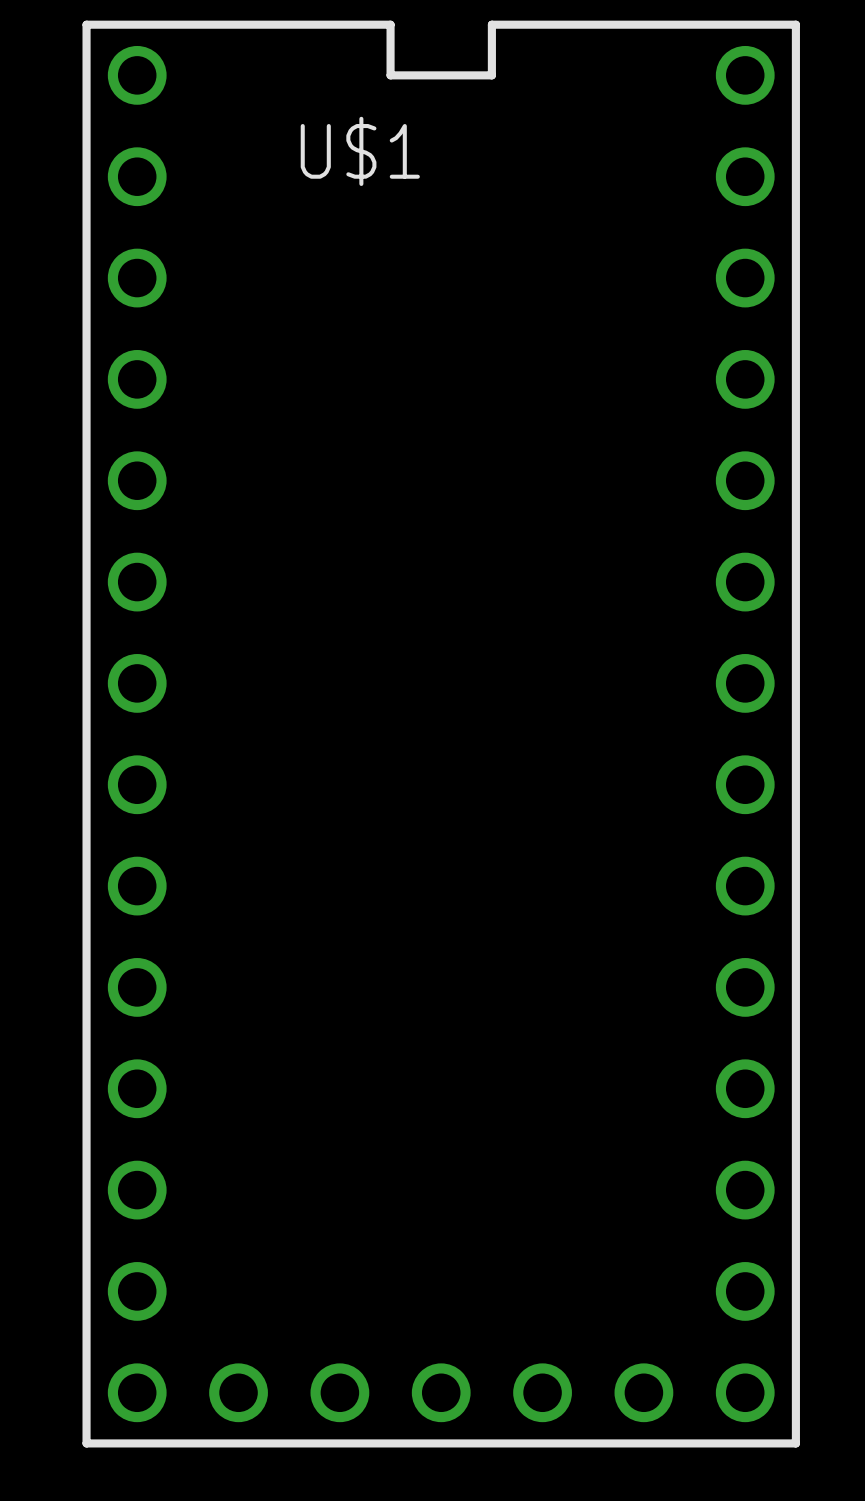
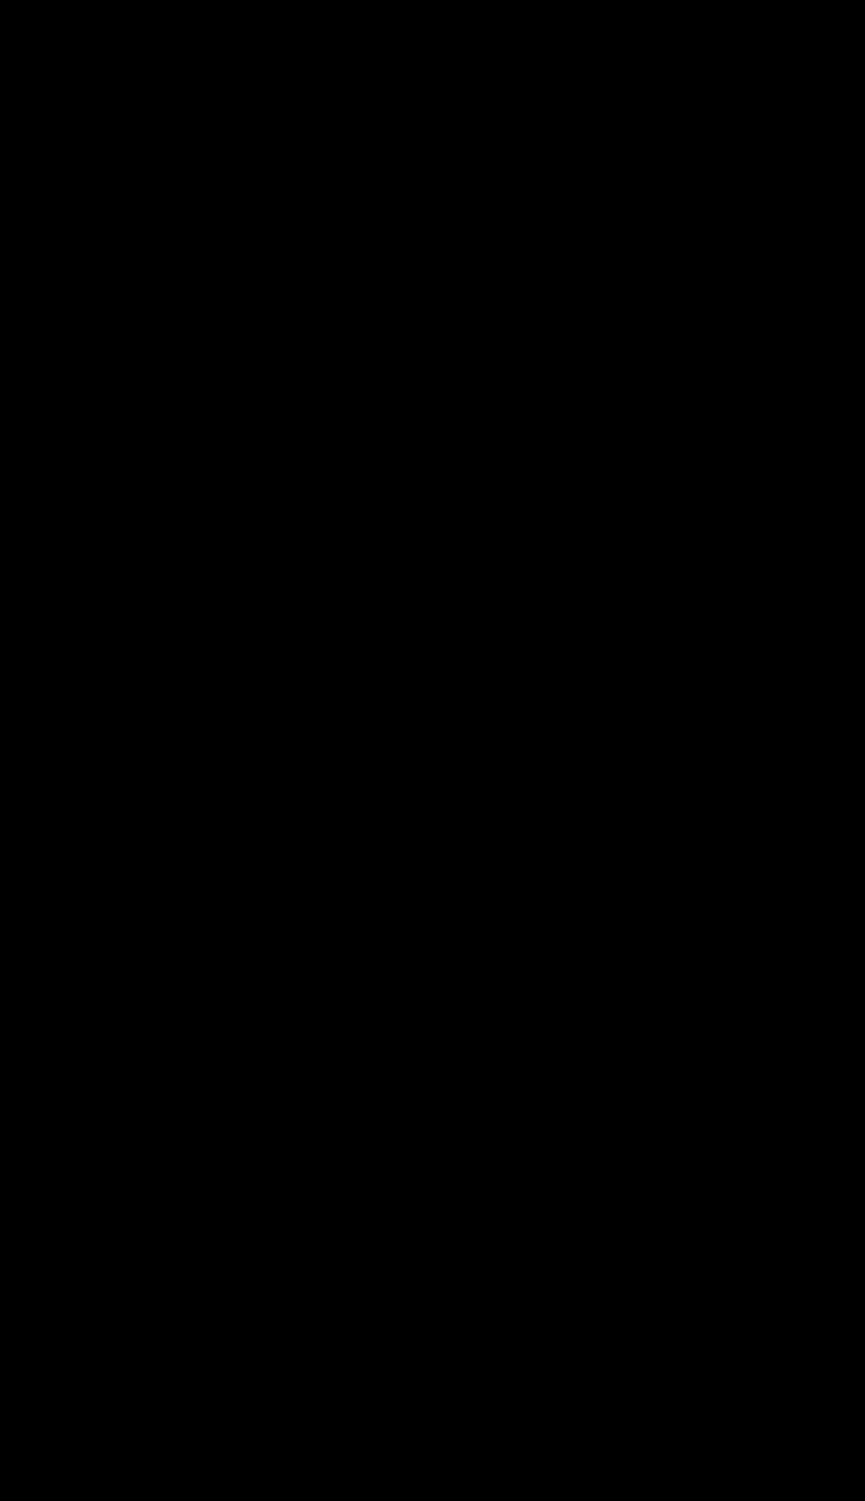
U$1: (441, 734) -> none

